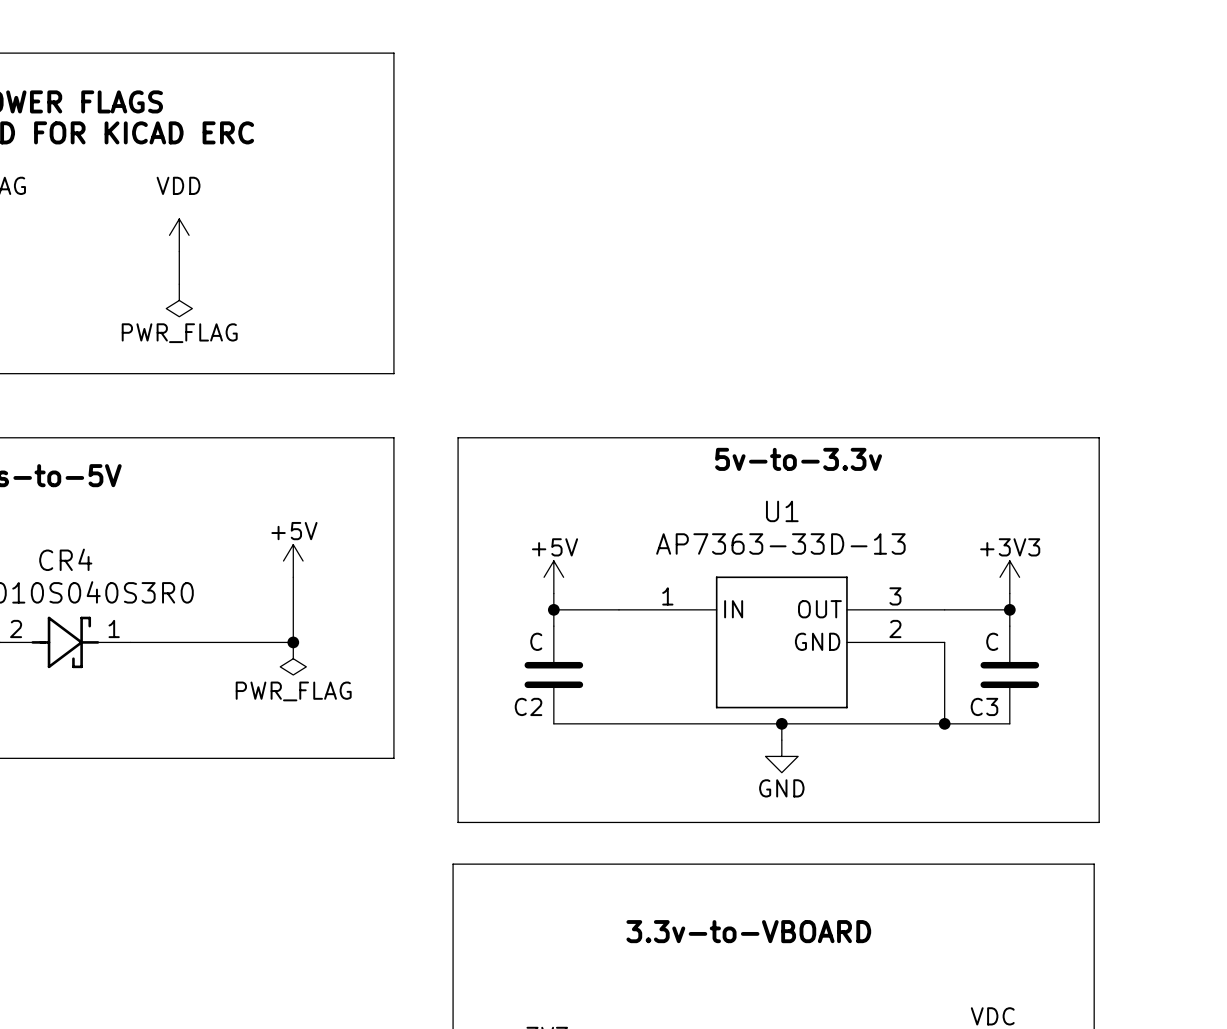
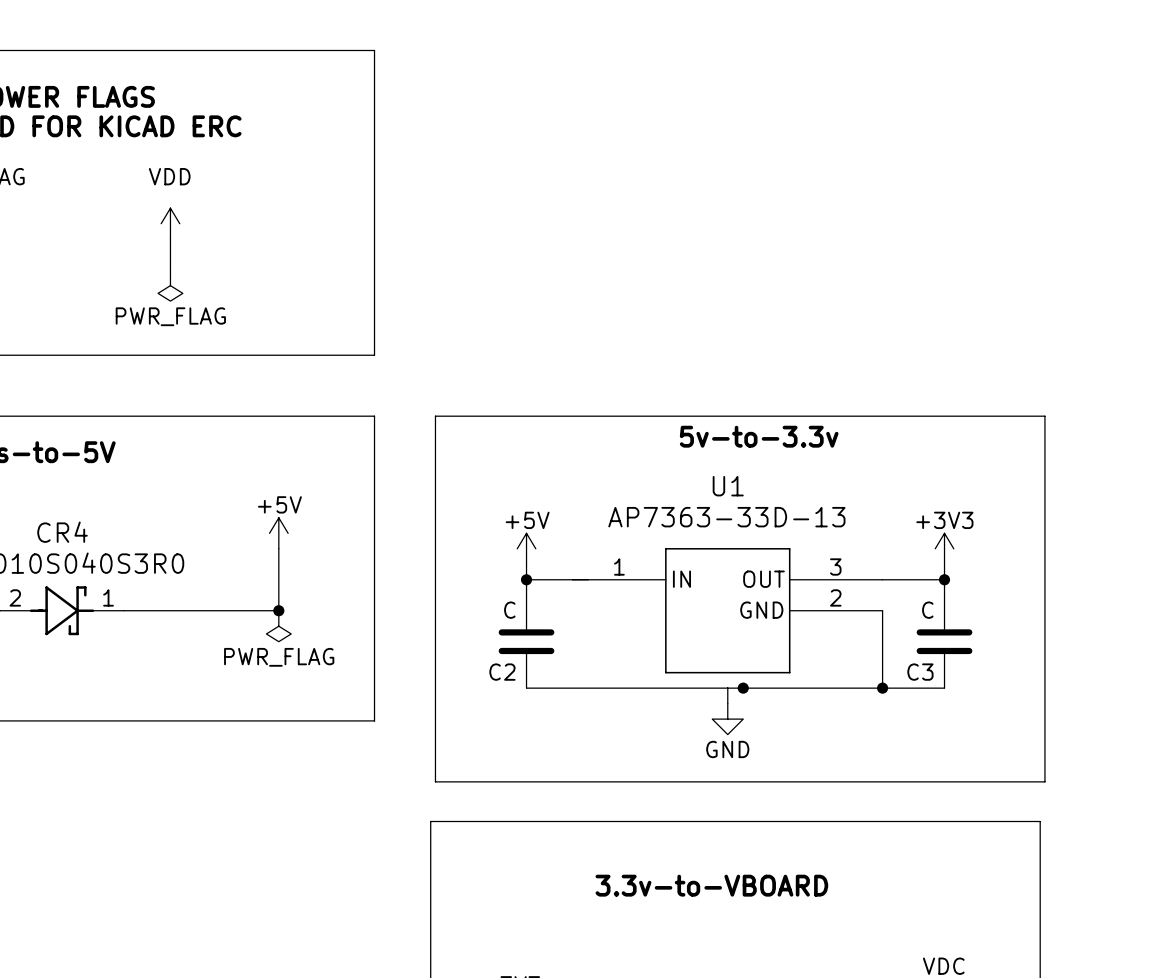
power symbol position: +3V3 (1009, 577) -> +3V3 (944, 548)
wire: (1009, 593) (1009, 626) -> (944, 564) (944, 595)
junction position: (1009, 609) -> (944, 579)
U1 position: (781, 642) -> (727, 610)
wire: (944, 642) (944, 723) -> (882, 610) (882, 688)
C3 position: (1009, 674) -> (944, 641)
wire: (781, 723) (781, 740) -> (727, 688) (727, 703)
junction position: (944, 723) -> (882, 688)
wire: (993, 723) (1009, 723) -> none
power symbol position: GND (781, 756) -> GND (727, 719)

